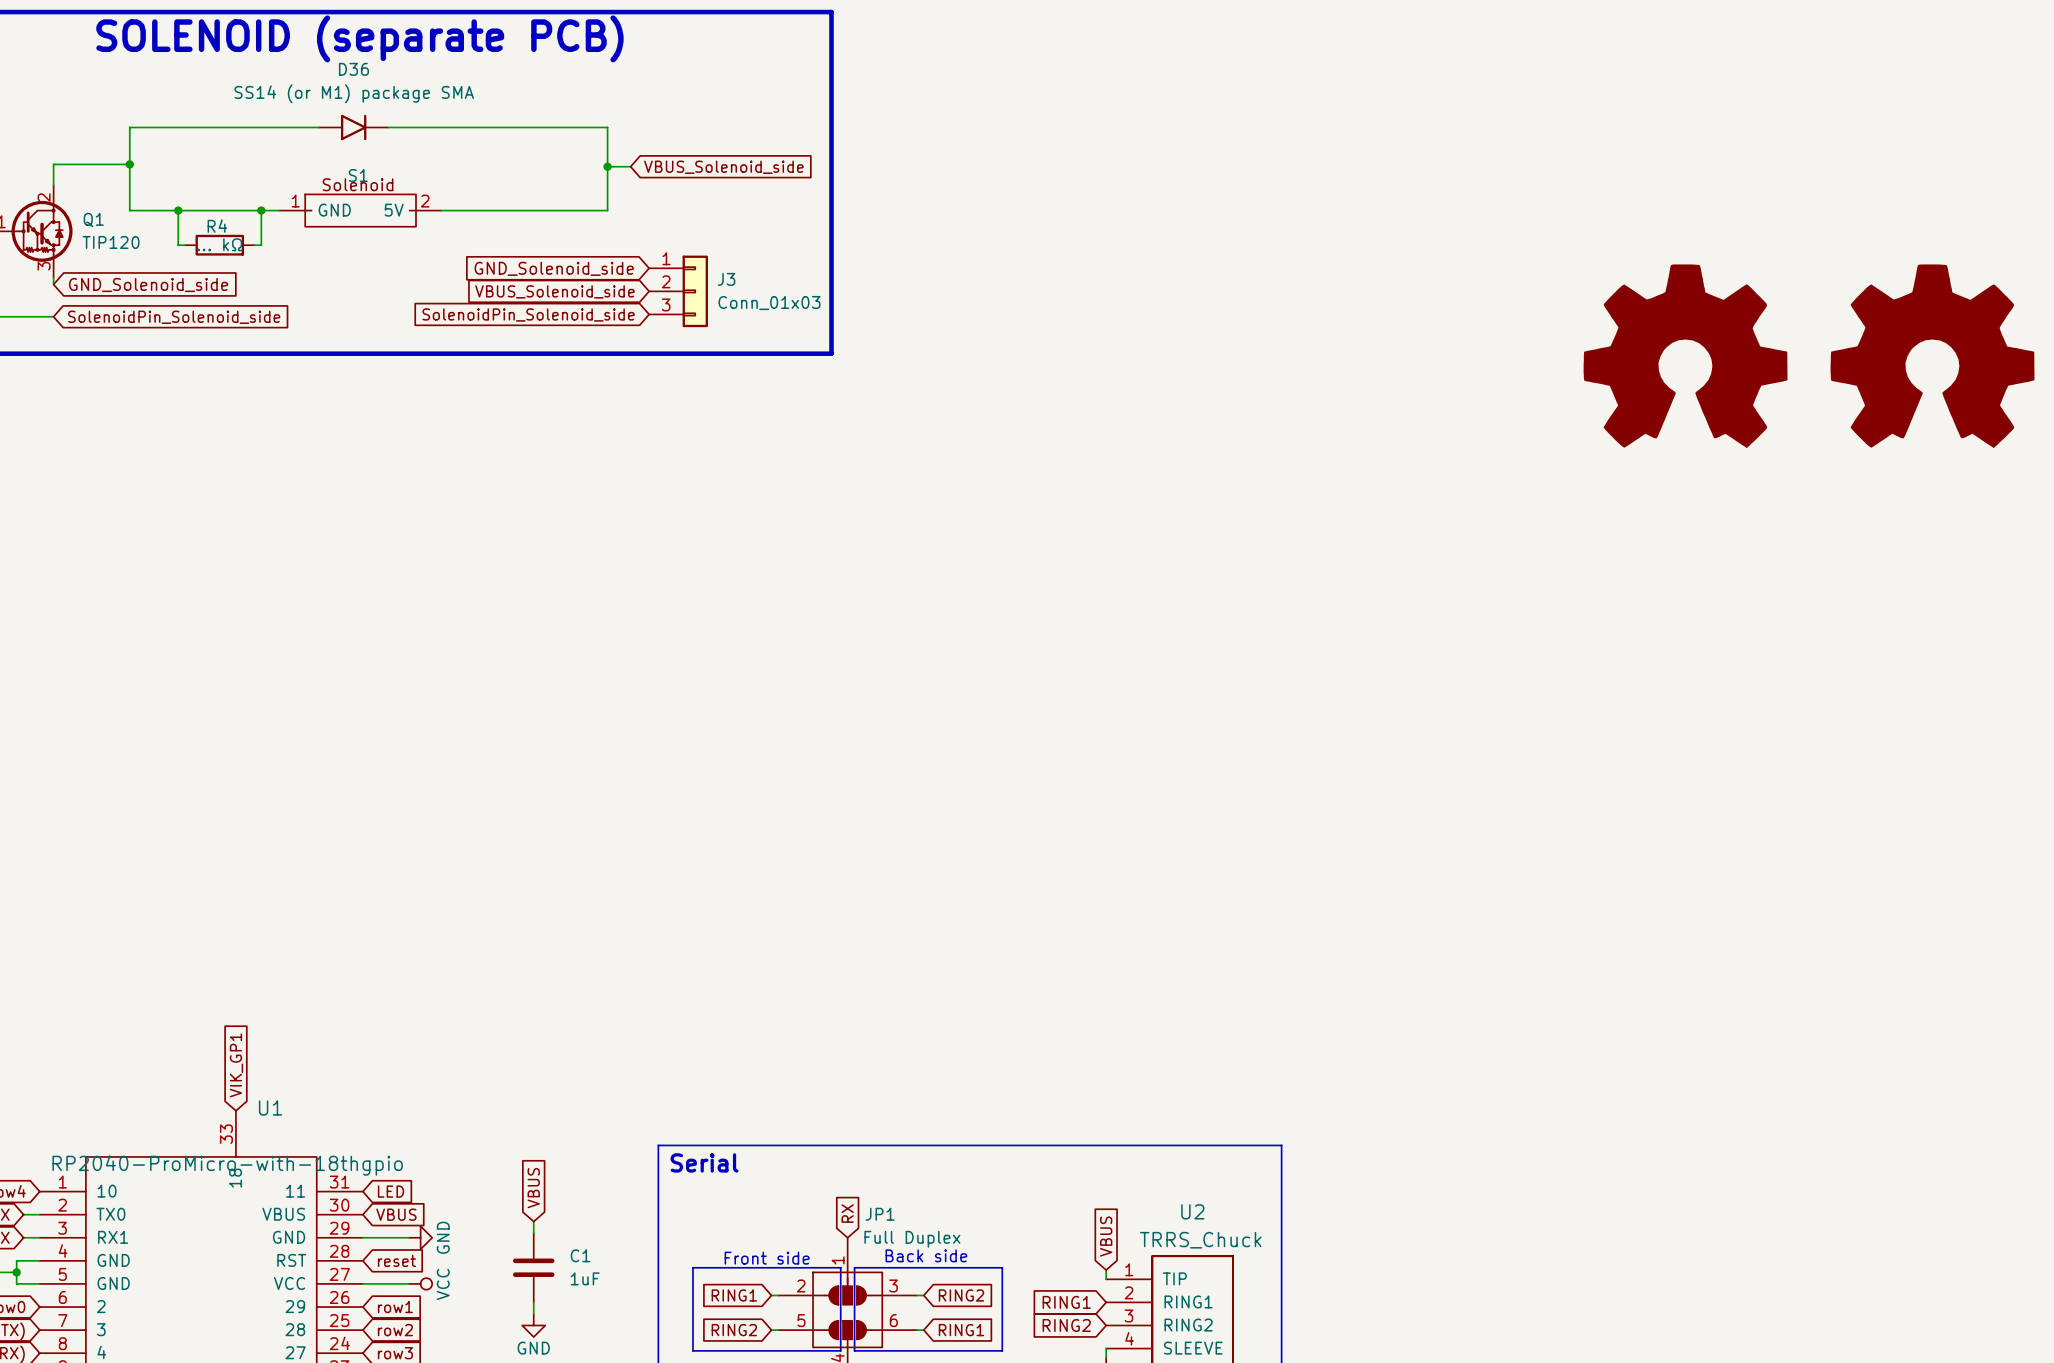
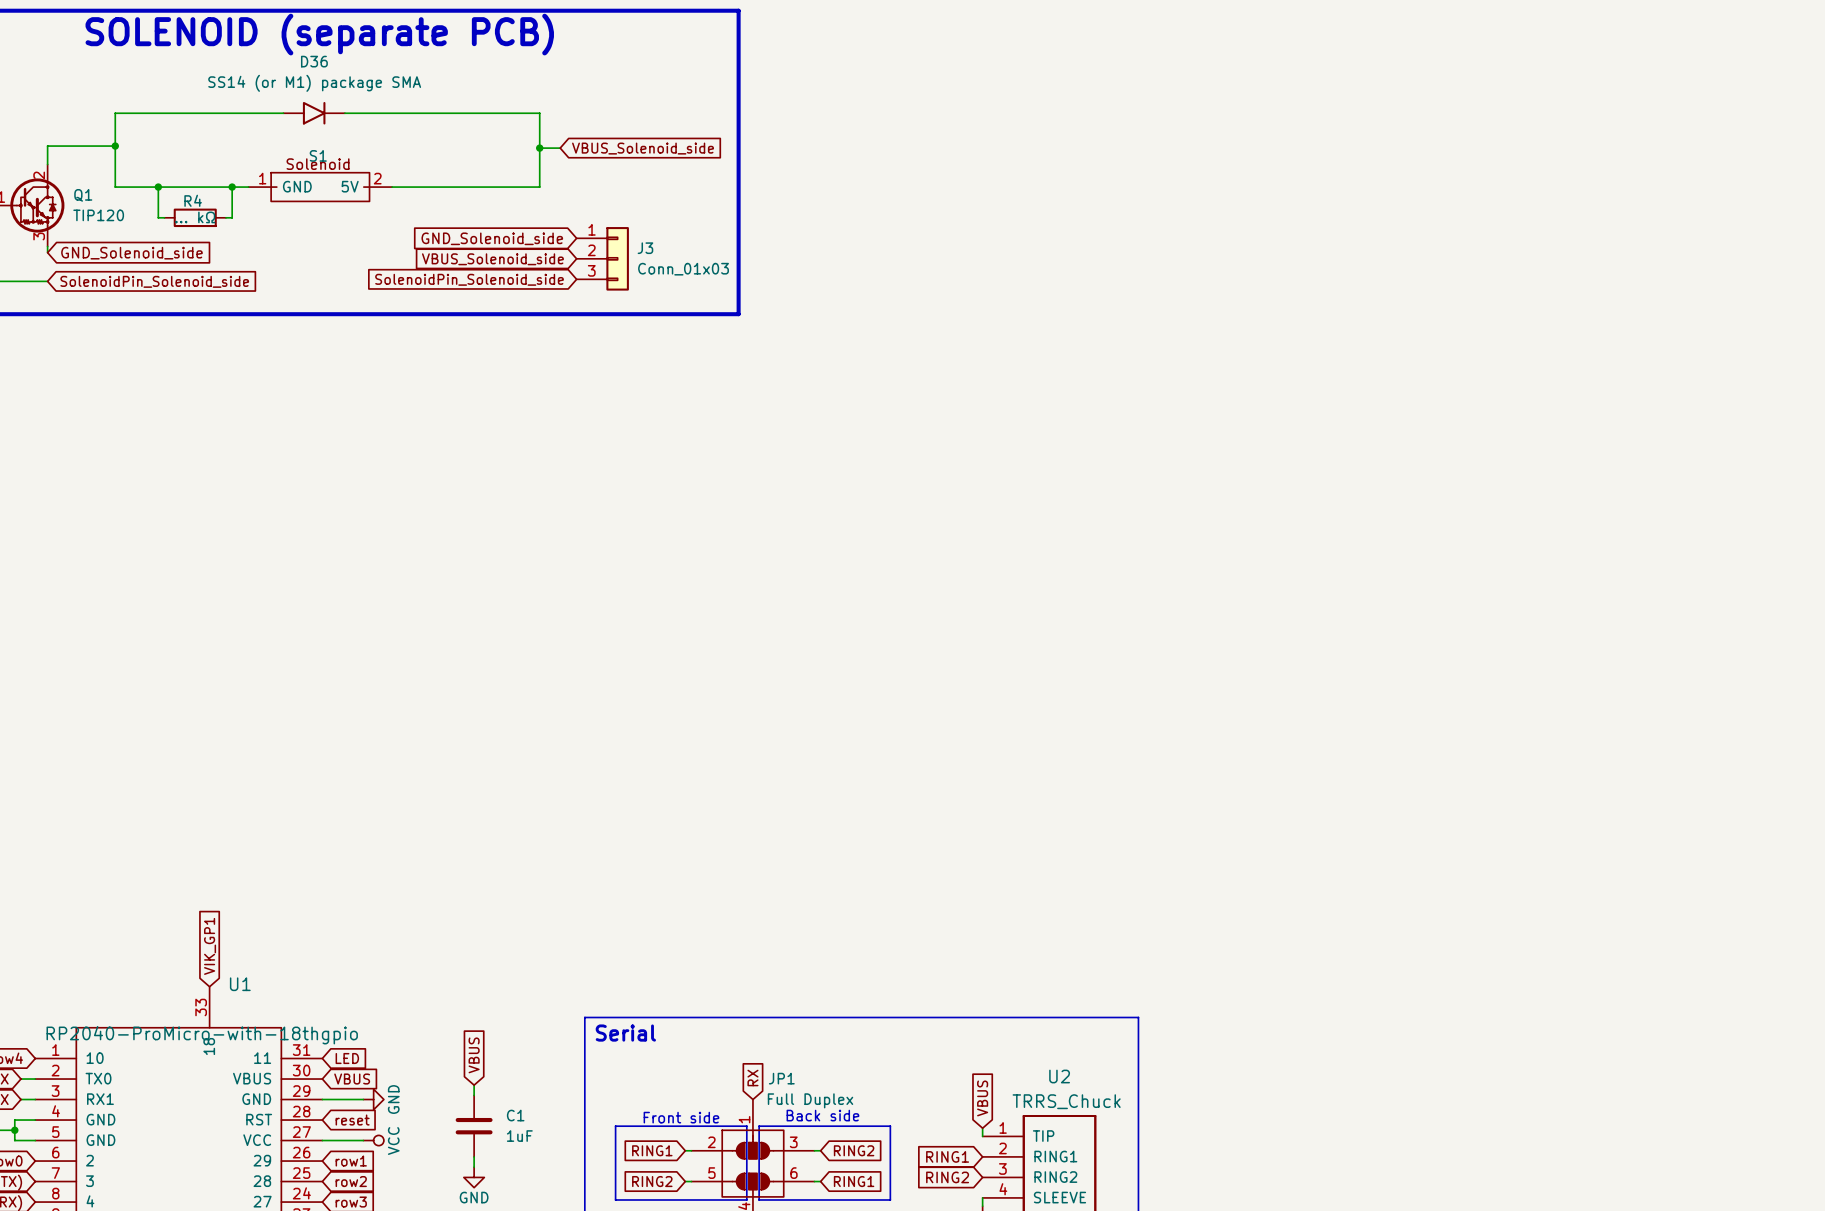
part: (1685, 356) -> none
part: (1932, 356) -> none

